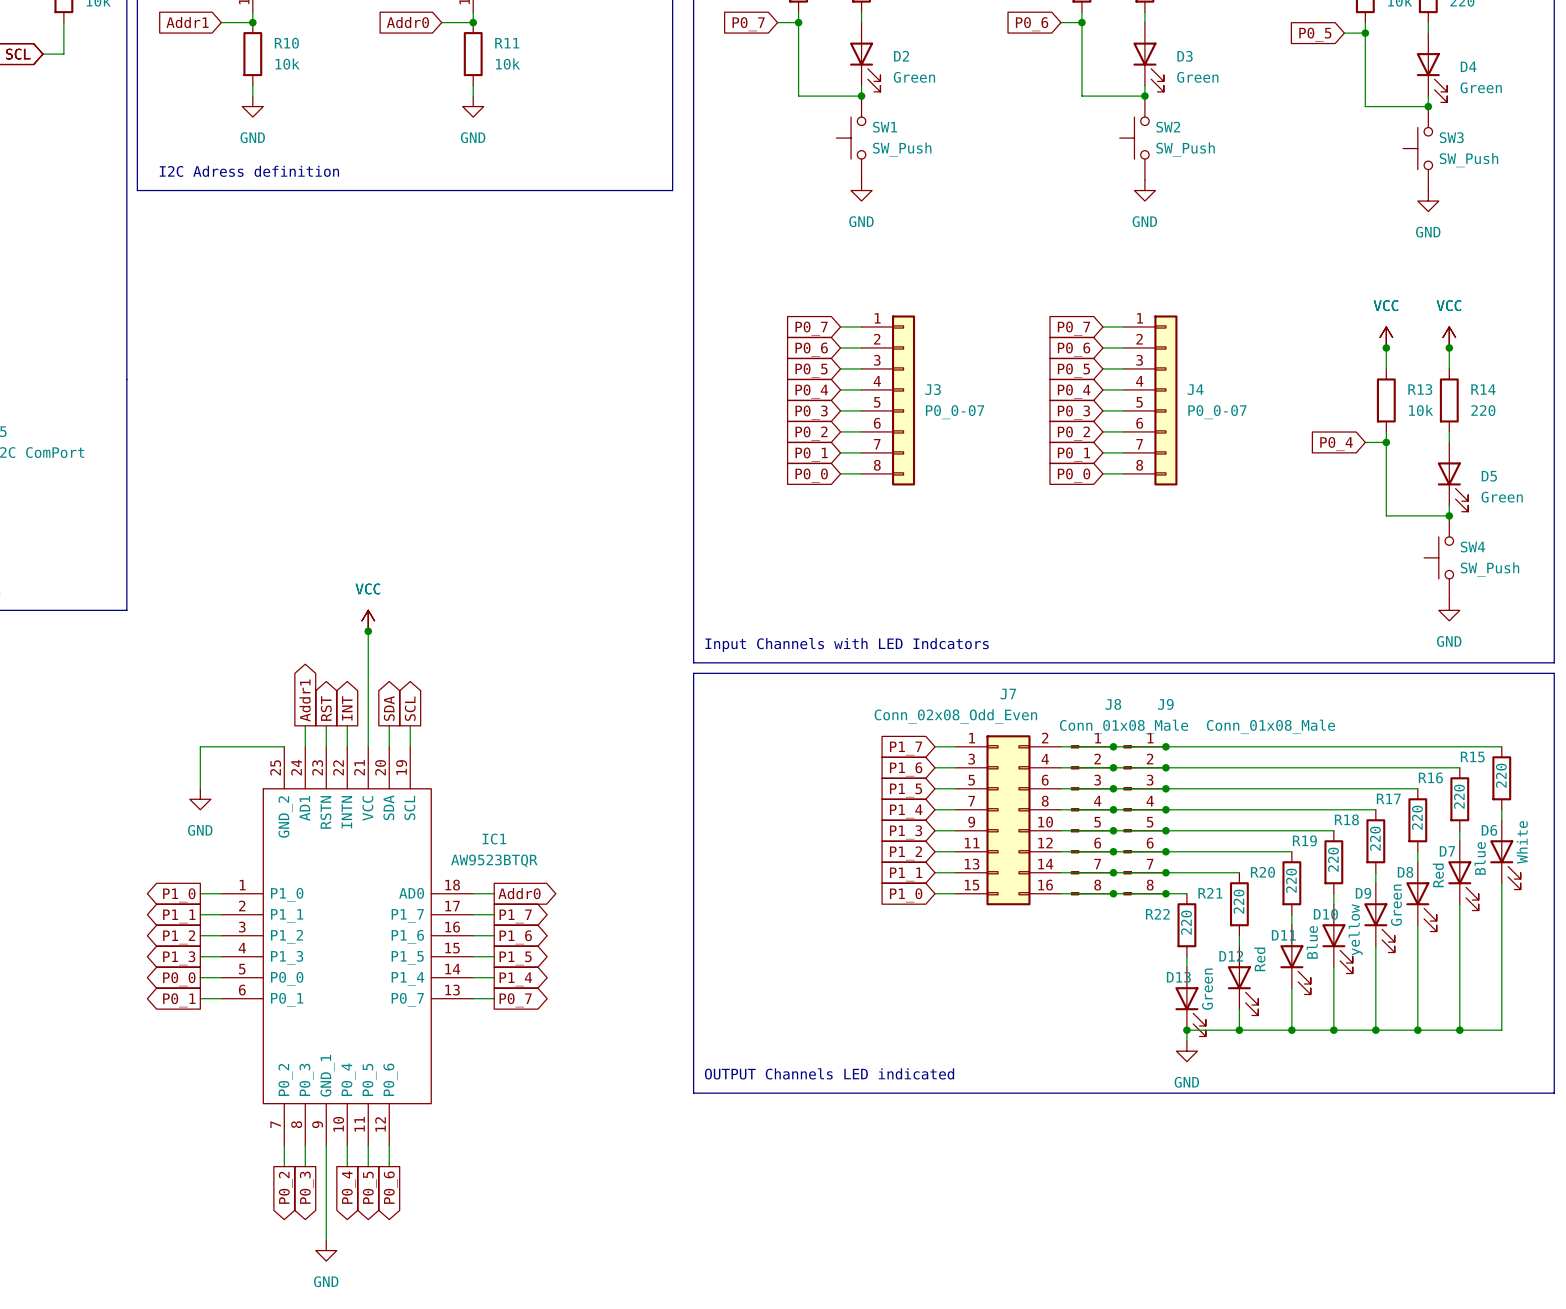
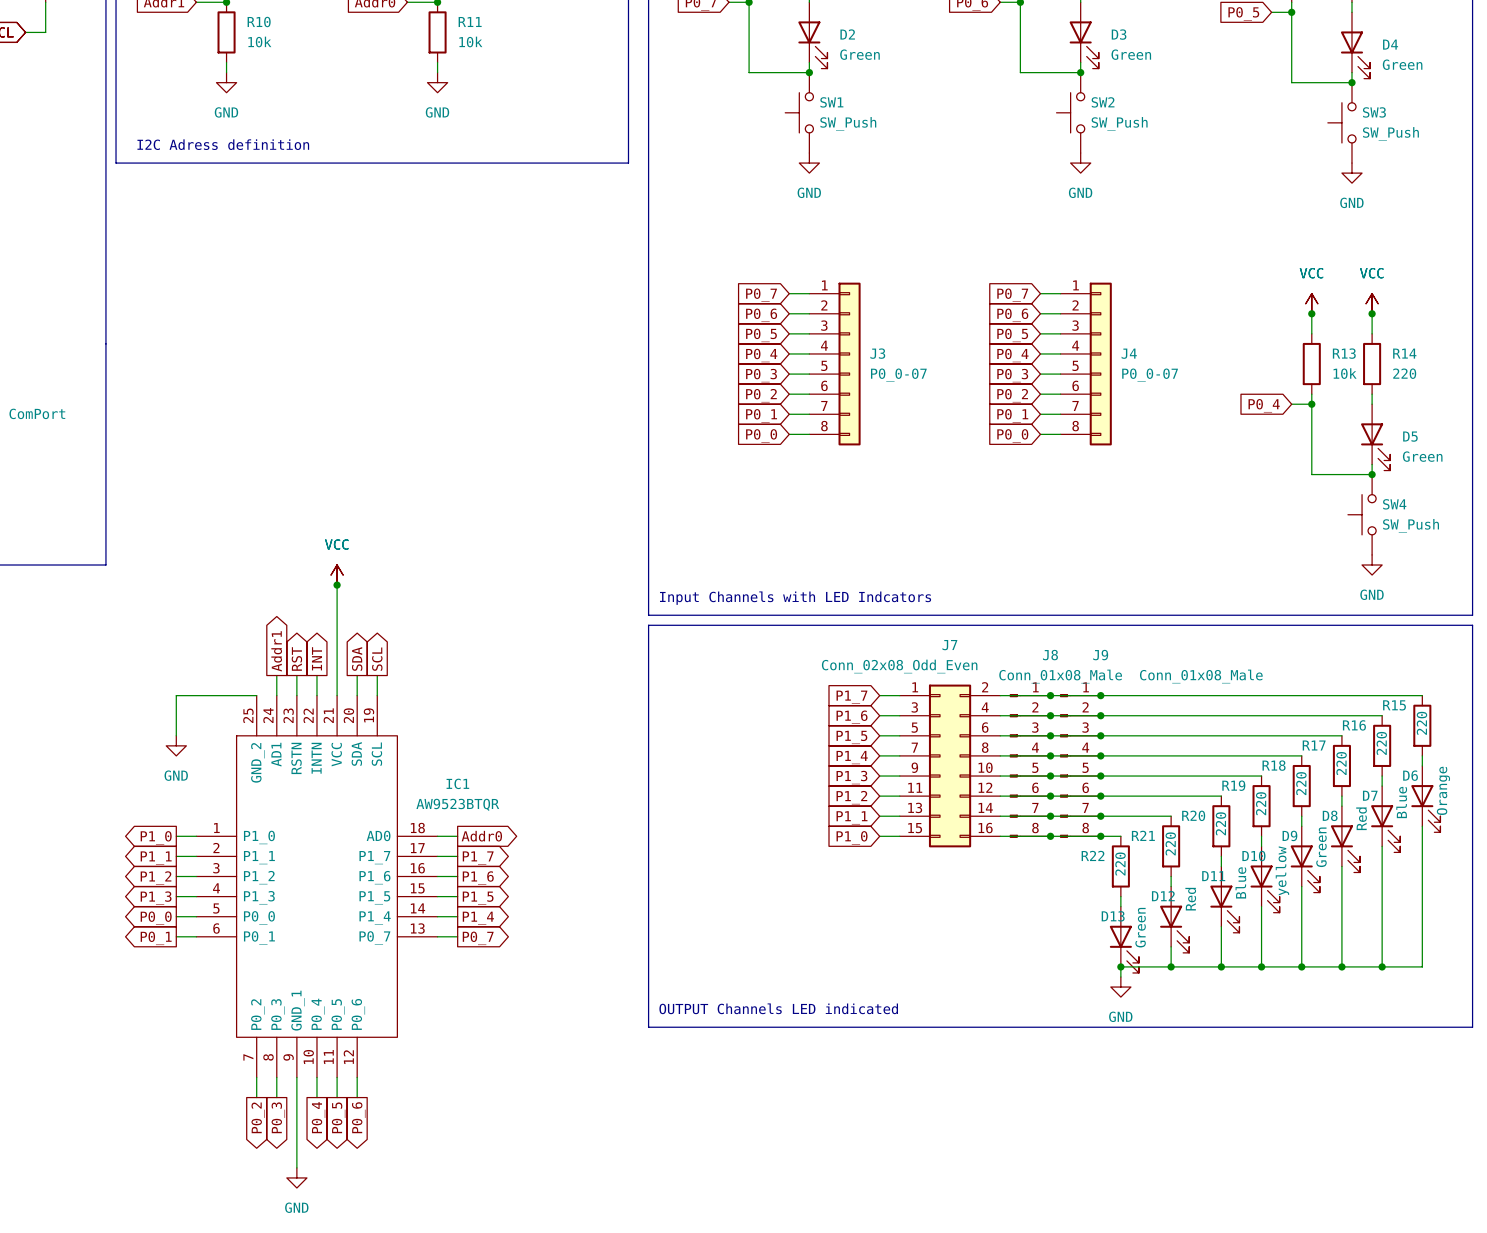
D6 value: White (1522, 842) -> Orange (1443, 790)

